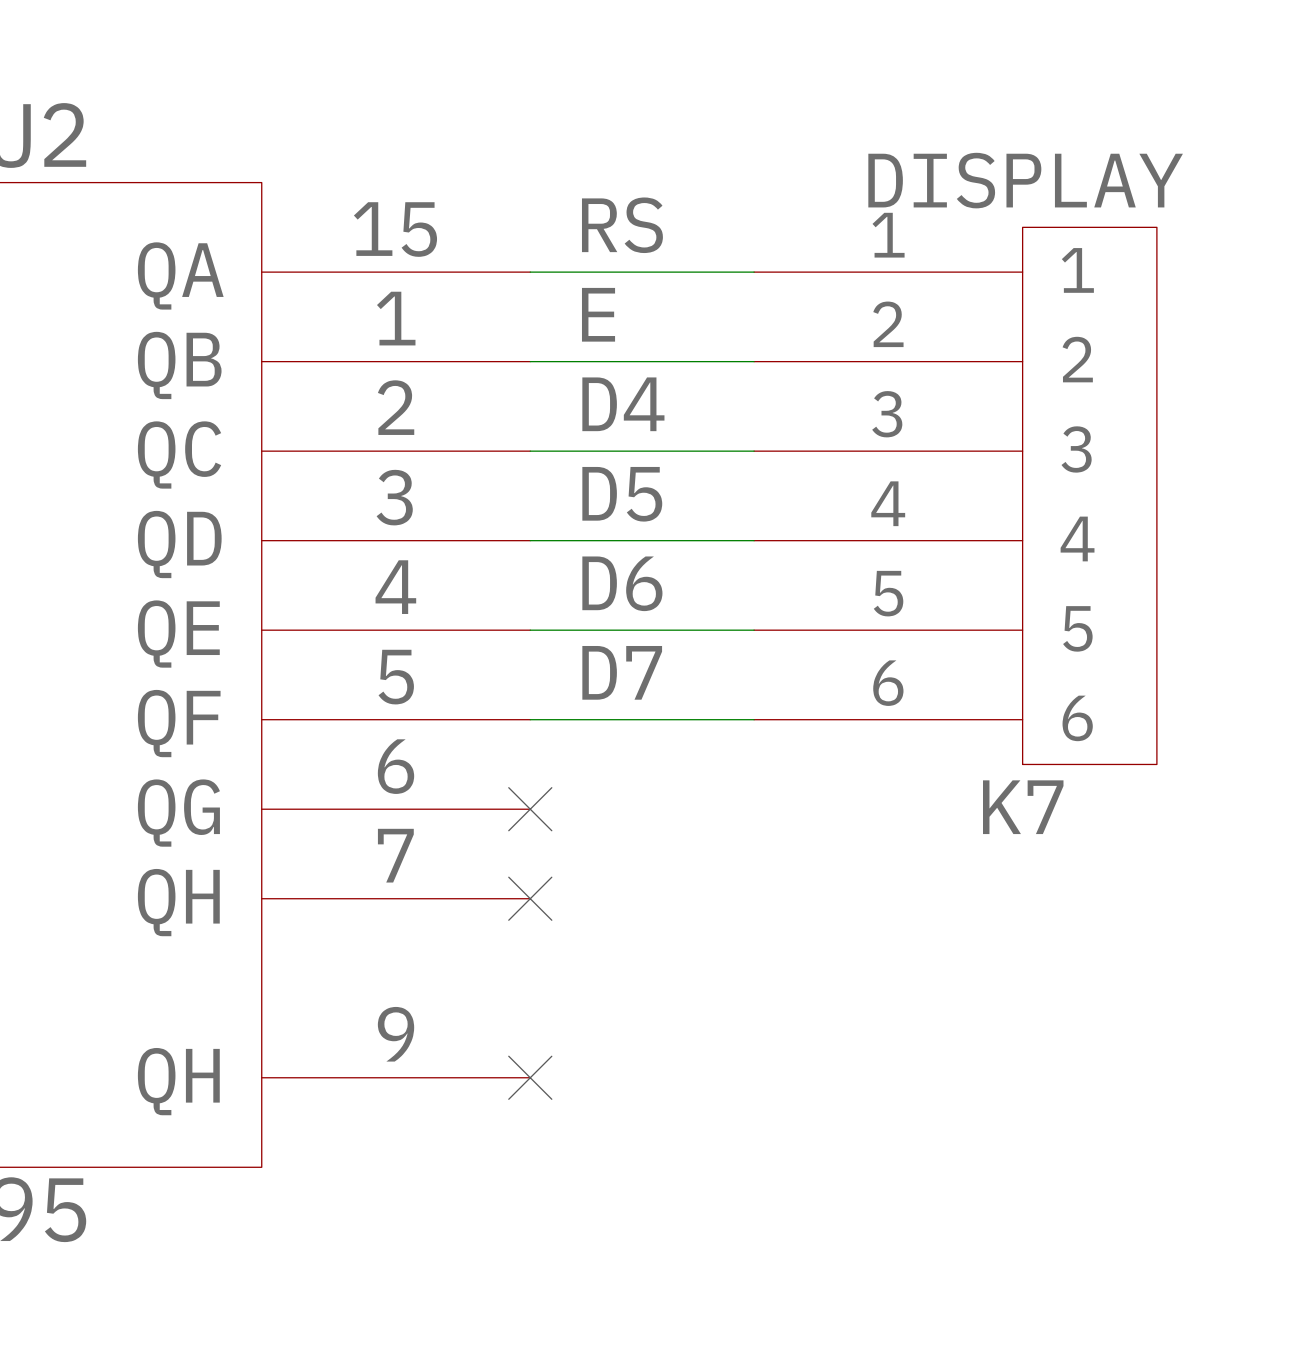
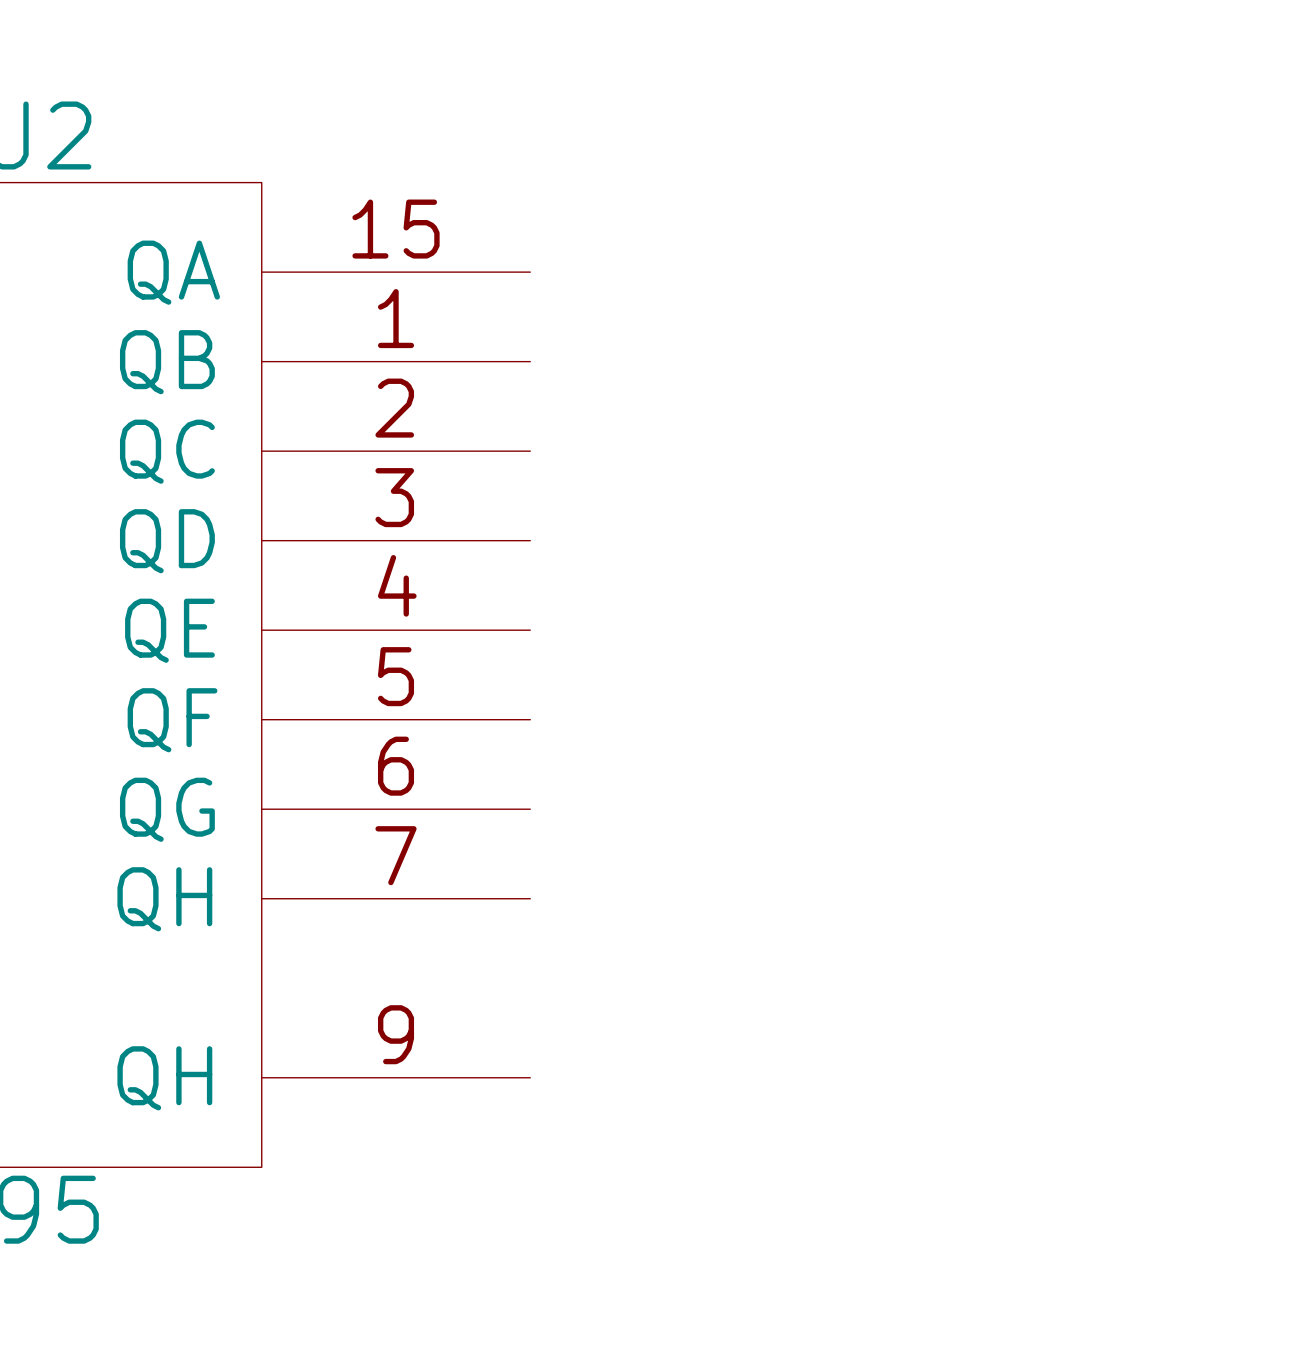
label: RS (622, 225) -> none
wire: (530, 272) (754, 272) -> none
label: E (598, 314) -> none
wire: (530, 361) (754, 361) -> none
label: D4 (623, 404) -> none
wire: (530, 451) (754, 451) -> none
label: D5 (622, 494) -> none
K7: DISPLAY (955, 495) -> none
wire: (530, 540) (754, 540) -> none
label: D6 (622, 583) -> none
wire: (530, 630) (754, 630) -> none
label: D7 (622, 672) -> none
wire: (530, 719) (754, 719) -> none
no-connect mark: (530, 809) -> none
no-connect mark: (530, 898) -> none
no-connect mark: (530, 1077) -> none

